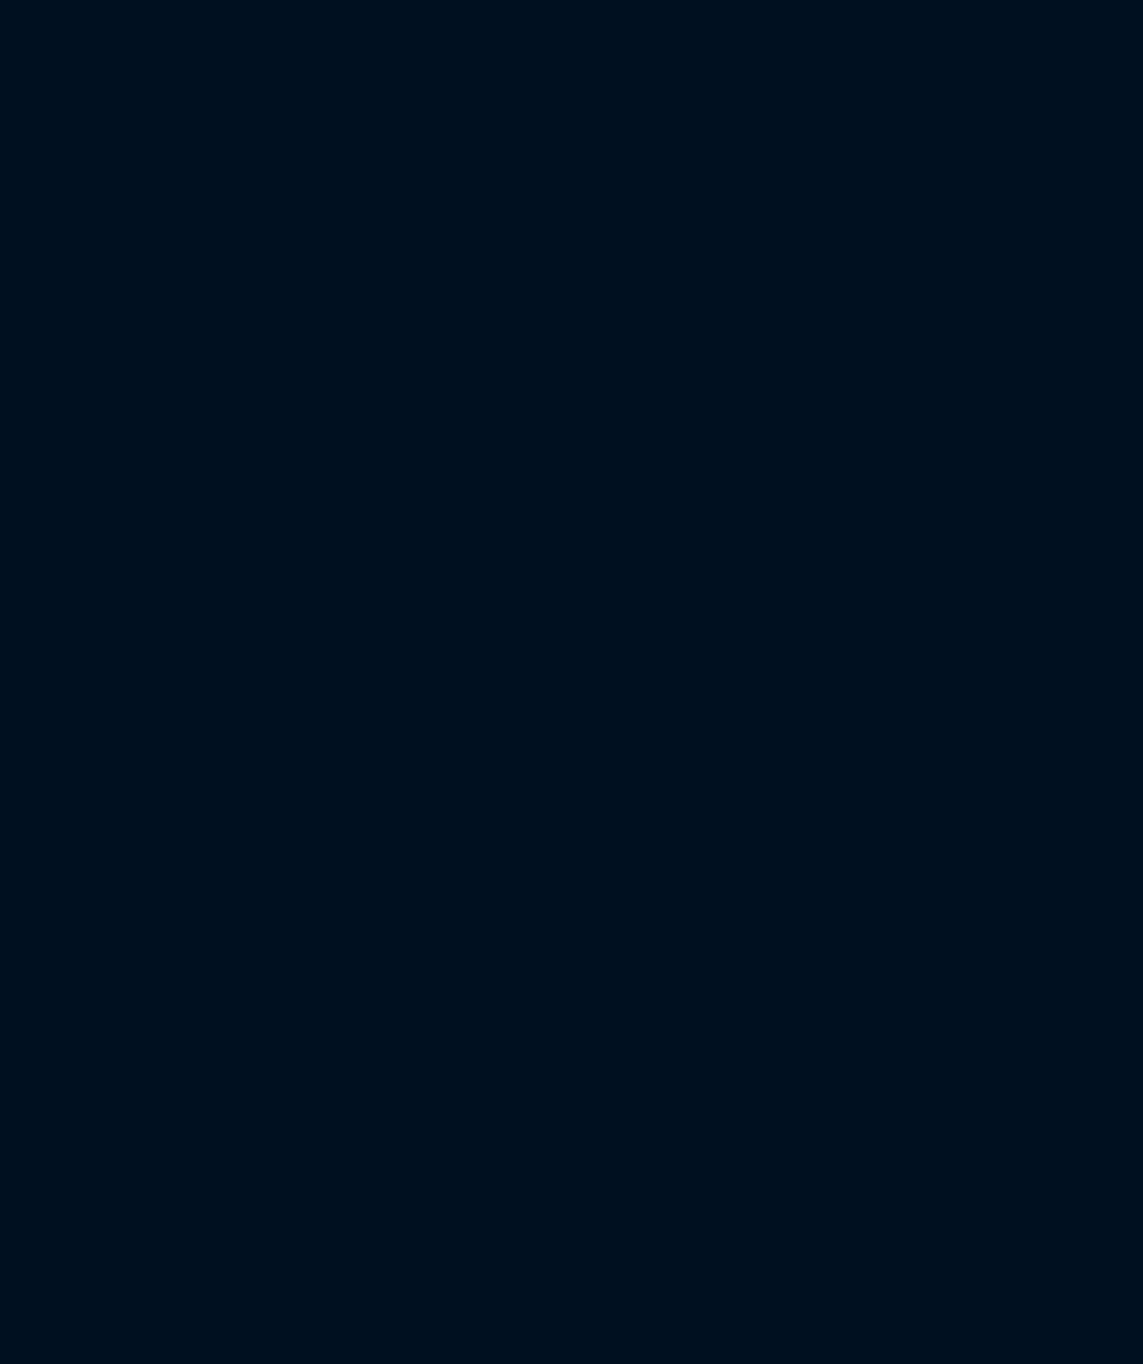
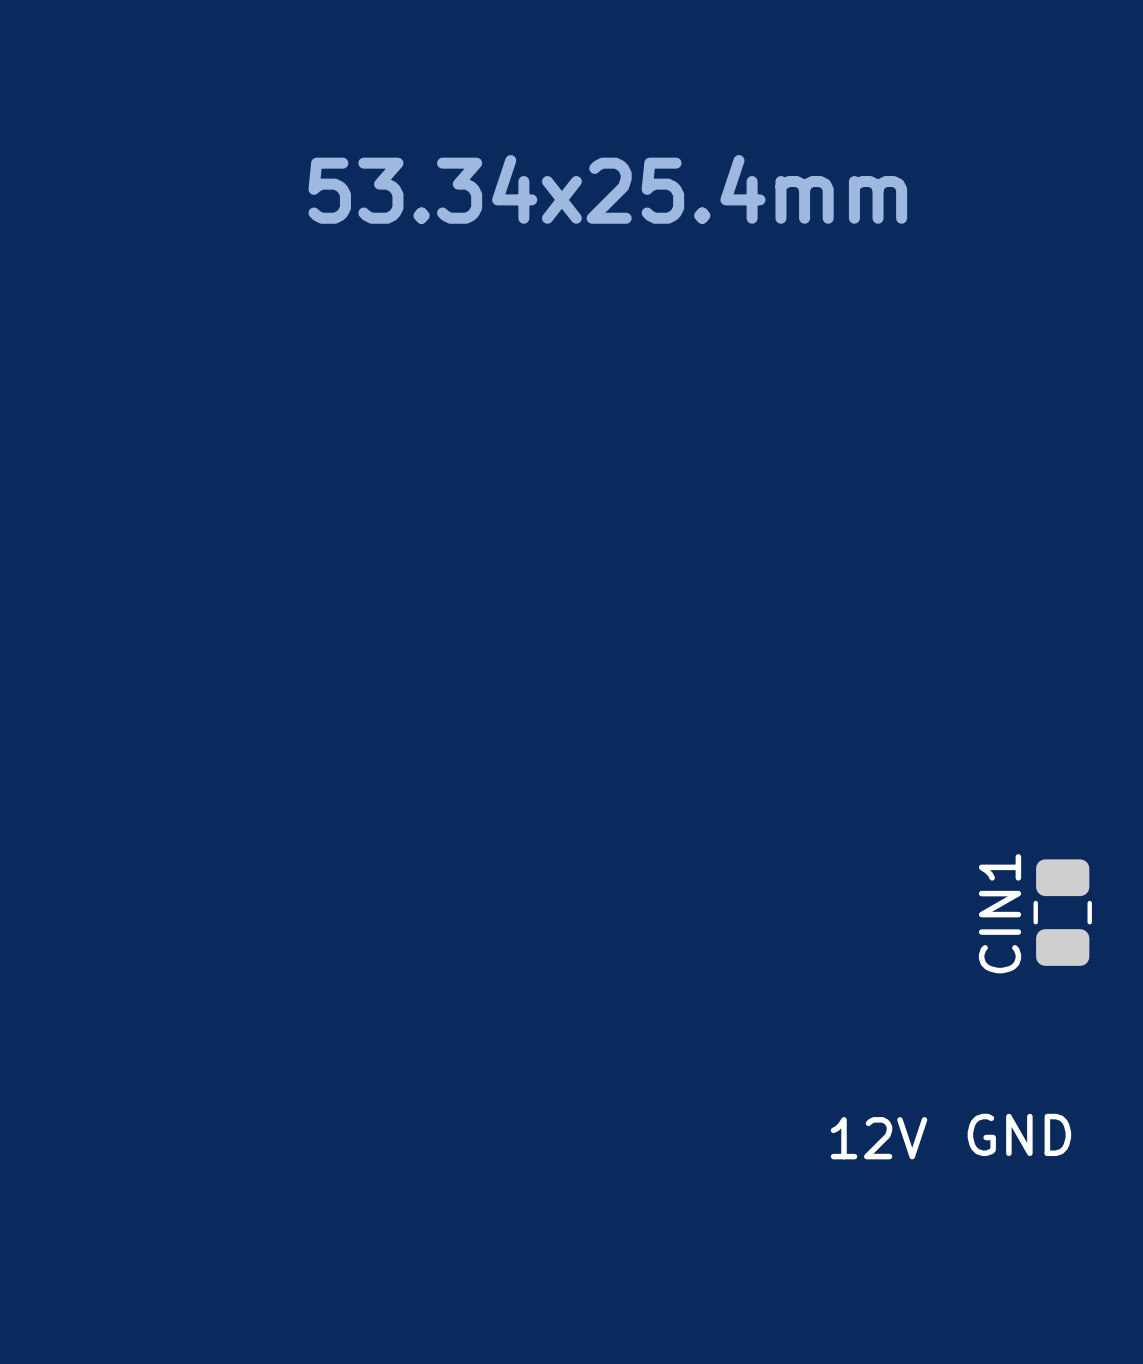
text: none -> 53.34x25.4mm (607, 189)
CIN1: none -> (1062, 912)
text: none -> GND (1019, 1134)
text: none -> 12V (878, 1138)

